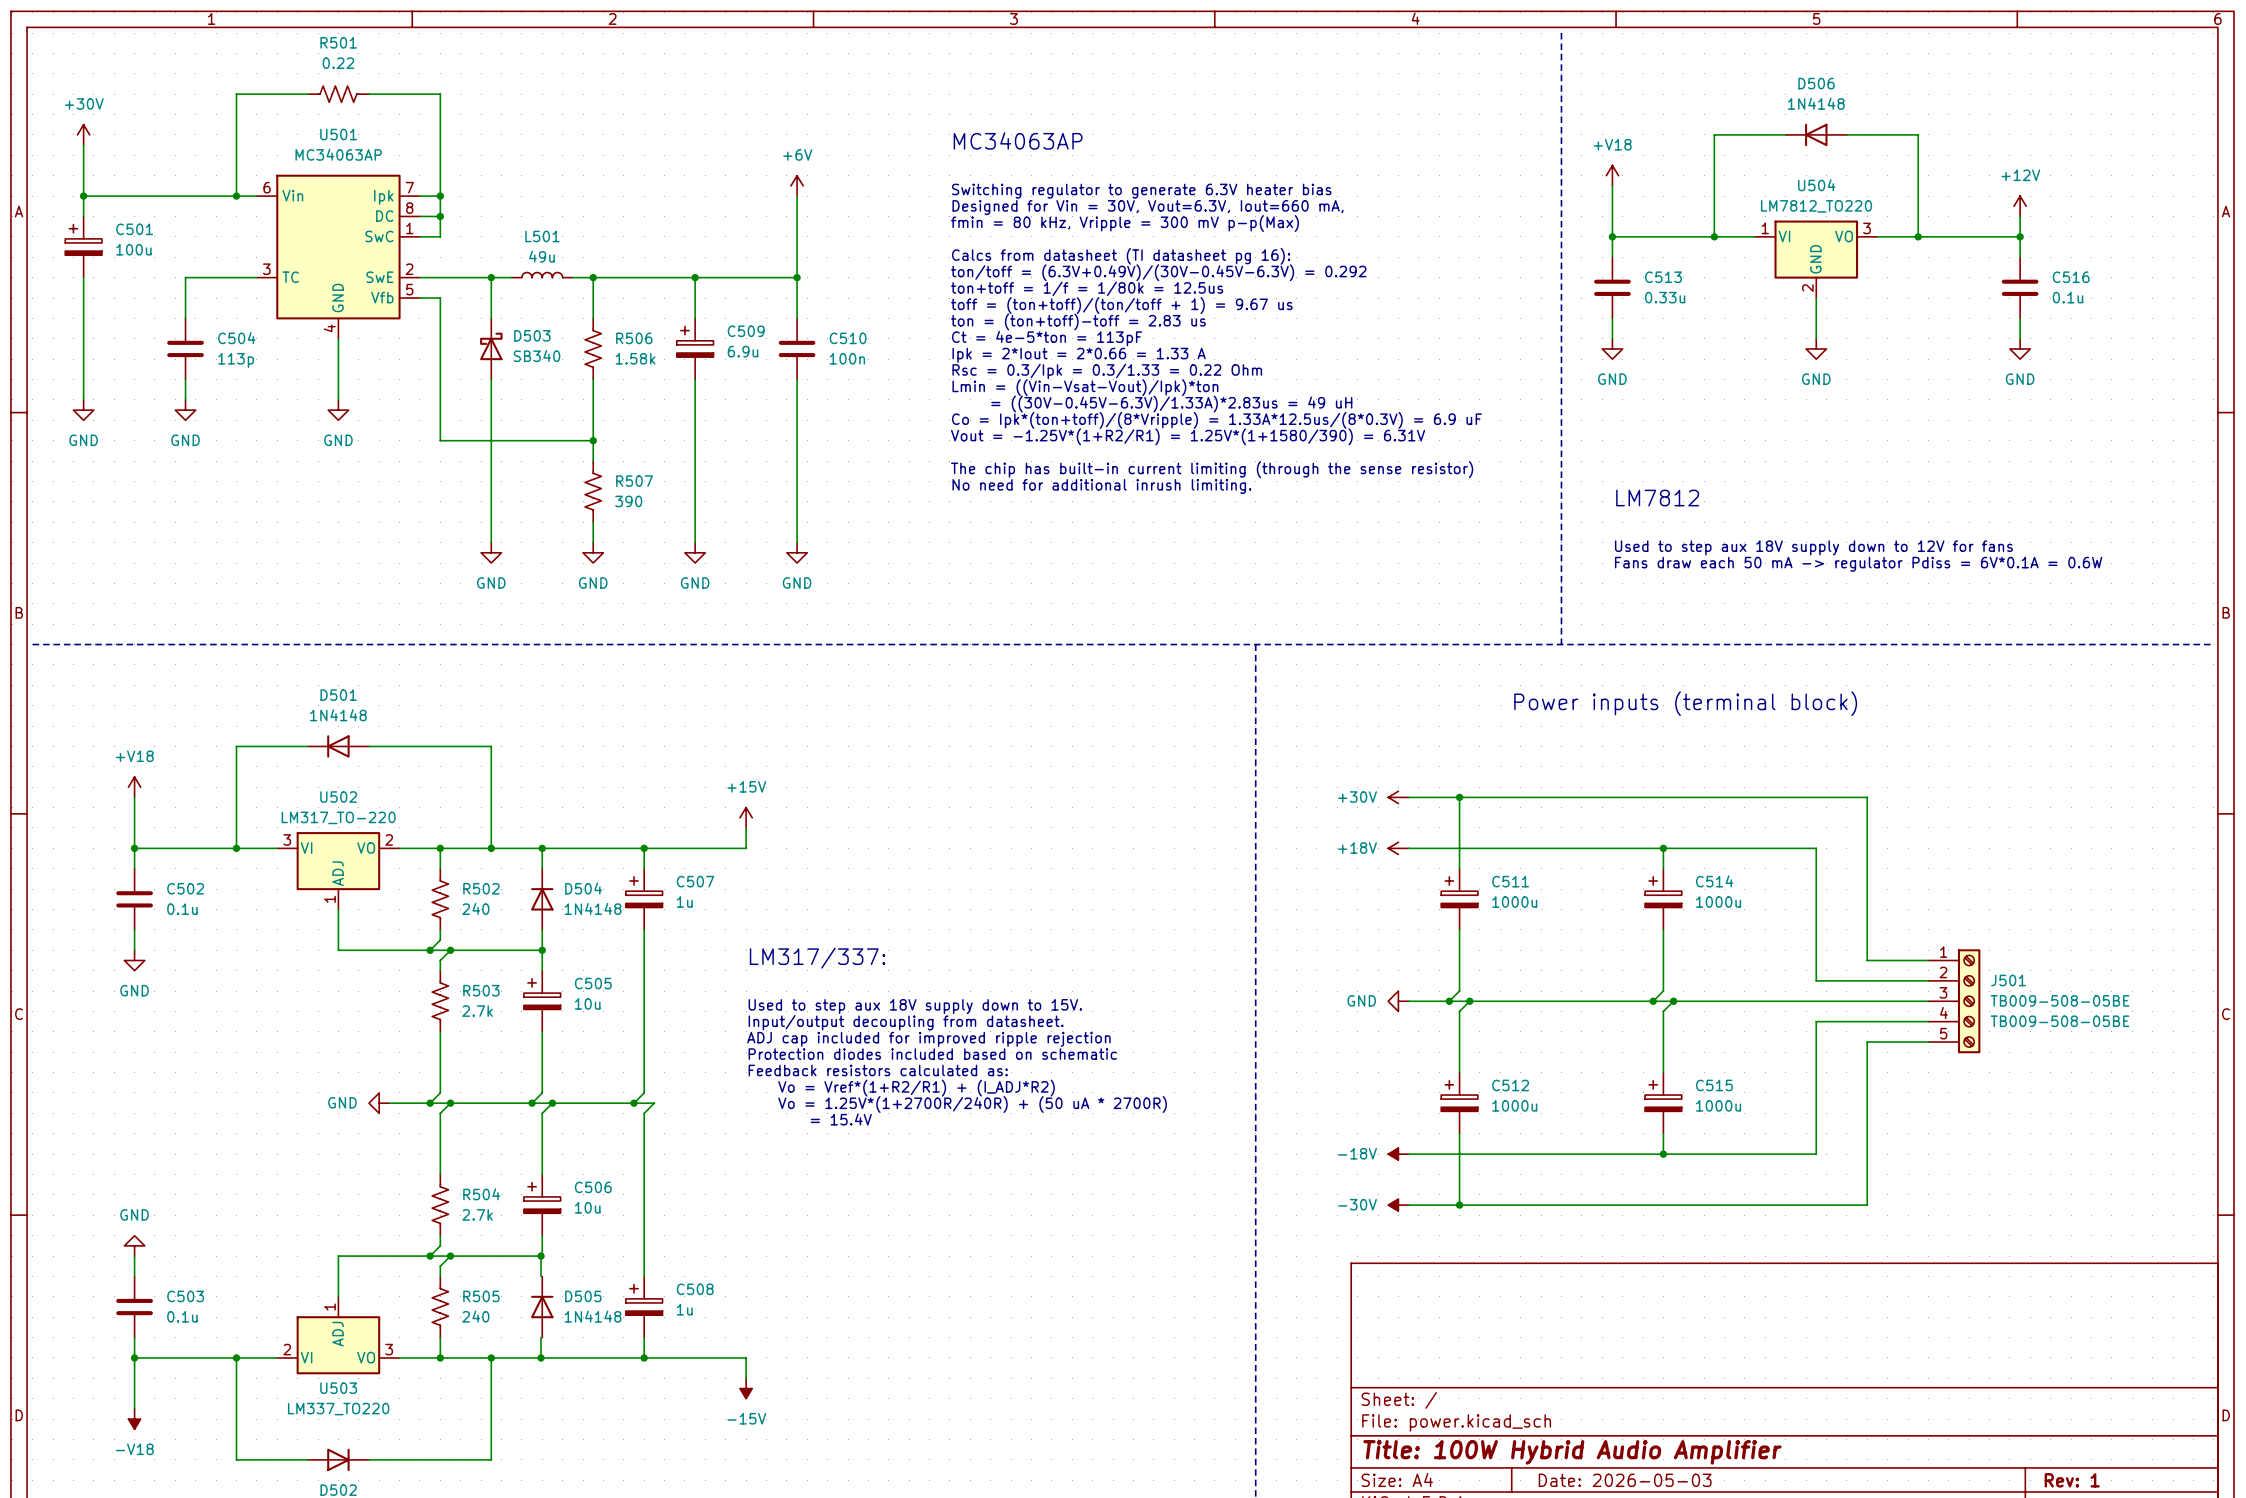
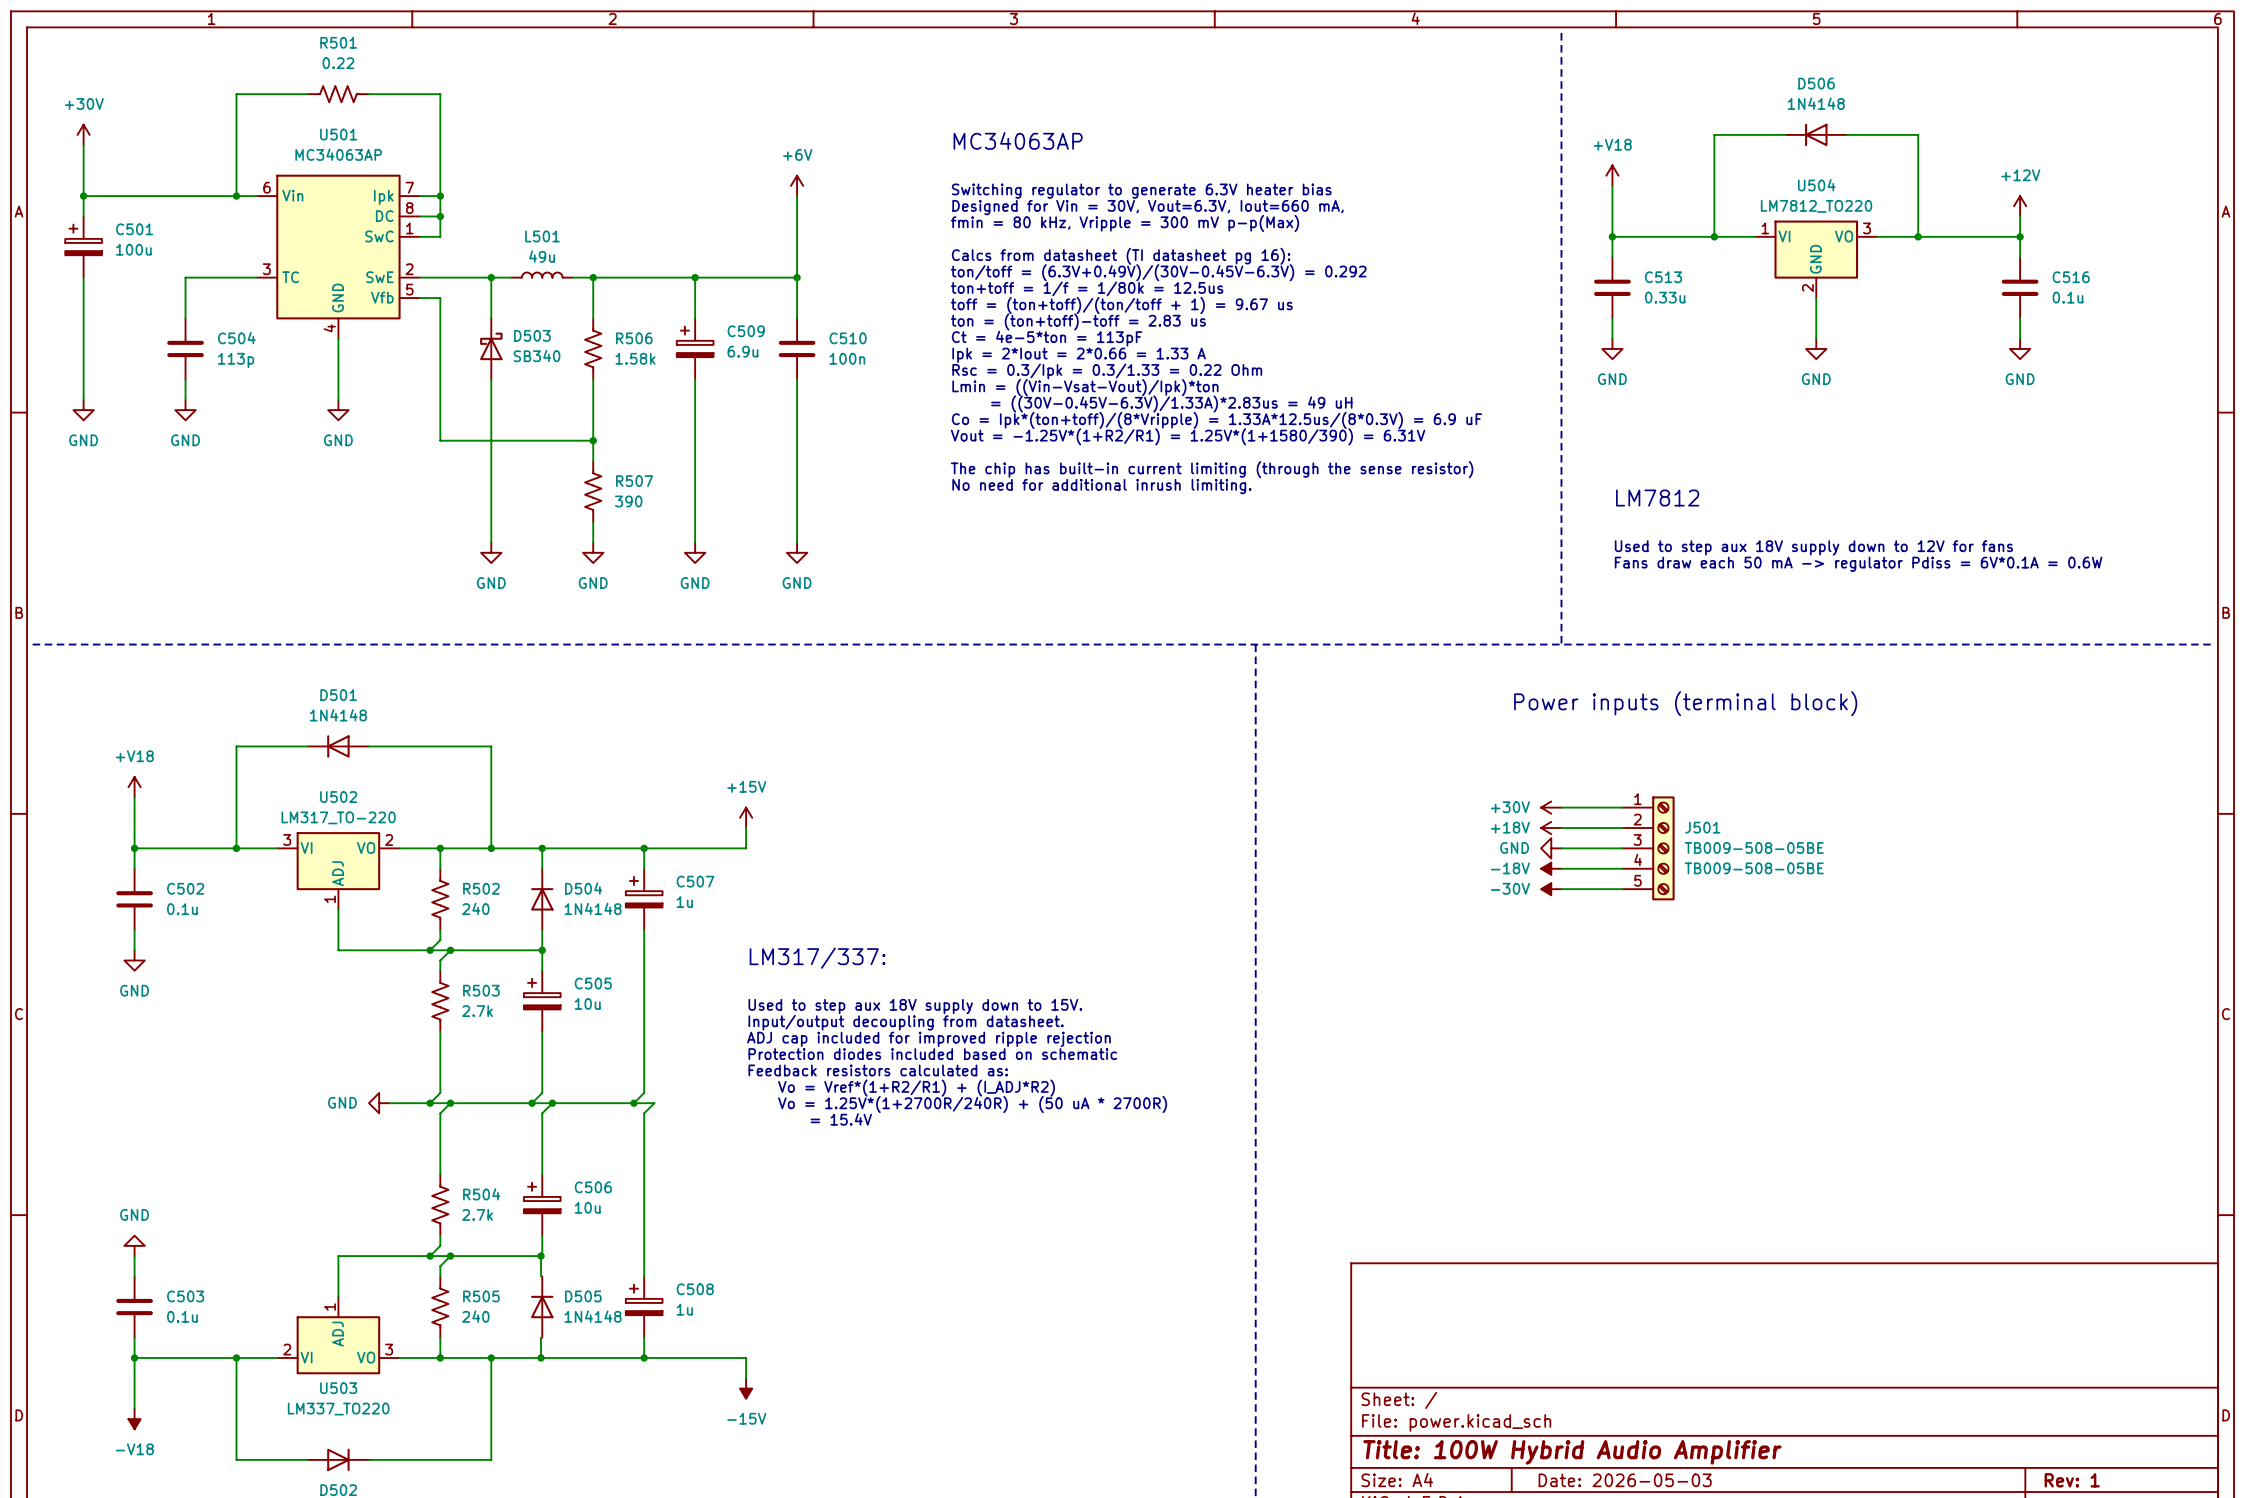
power symbol position: +30V (1398, 797) -> +30V (1551, 807)
wire: (1408, 797) (1867, 797) (1867, 960) (1928, 960) -> none
wire: (1459, 797) (1459, 868) -> none
junction: (1459, 797) -> none
wire: none -> (1561, 807) (1622, 807)
wire: none -> (1561, 827) (1622, 827)
power symbol position: +18V (1398, 848) -> +18V (1551, 827)
wire: (1408, 848) (1561, 848) -> none
power symbol: none -> GND (1551, 848)
wire: (1622, 848) (1816, 848) (1816, 980) (1928, 980) -> none
junction: (1663, 848) -> none
power symbol: none -> -18V (1551, 868)
wire: none -> (1561, 868) (1622, 868)
power symbol: none -> -30V (1551, 889)
wire: none -> (1561, 889) (1622, 889)
C511: 1000u (1459, 899) -> none
C514: 1000u (1663, 899) -> none
wire: (1459, 929) (1459, 991) (1449, 1001) -> none
wire: (1663, 929) (1663, 991) (1653, 1001) -> none
power symbol: GND (1398, 1001) -> none
wire: (1408, 1001) (1928, 1001) -> none
junction: (1449, 1001) -> none
wire: (1469, 1001) (1459, 1011) (1459, 1072) -> none
junction: (1469, 1001) -> none
junction: (1653, 1001) -> none
wire: (1673, 1001) (1663, 1011) (1663, 1072) -> none
junction: (1673, 1001) -> none
J501 position: (1954, 1001) -> (1648, 848)
wire: (1928, 1021) (1816, 1021) (1816, 1154) (1408, 1154) -> none
wire: (1928, 1042) (1867, 1042) (1867, 1205) (1408, 1205) -> none
C512: 1000u (1459, 1103) -> none
C515: 1000u (1663, 1103) -> none
wire: (1459, 1133) (1459, 1205) -> none
wire: (1663, 1133) (1663, 1154) -> none
power symbol: -18V (1398, 1154) -> none
junction: (1663, 1154) -> none
power symbol: -30V (1398, 1205) -> none
junction: (1459, 1205) -> none

